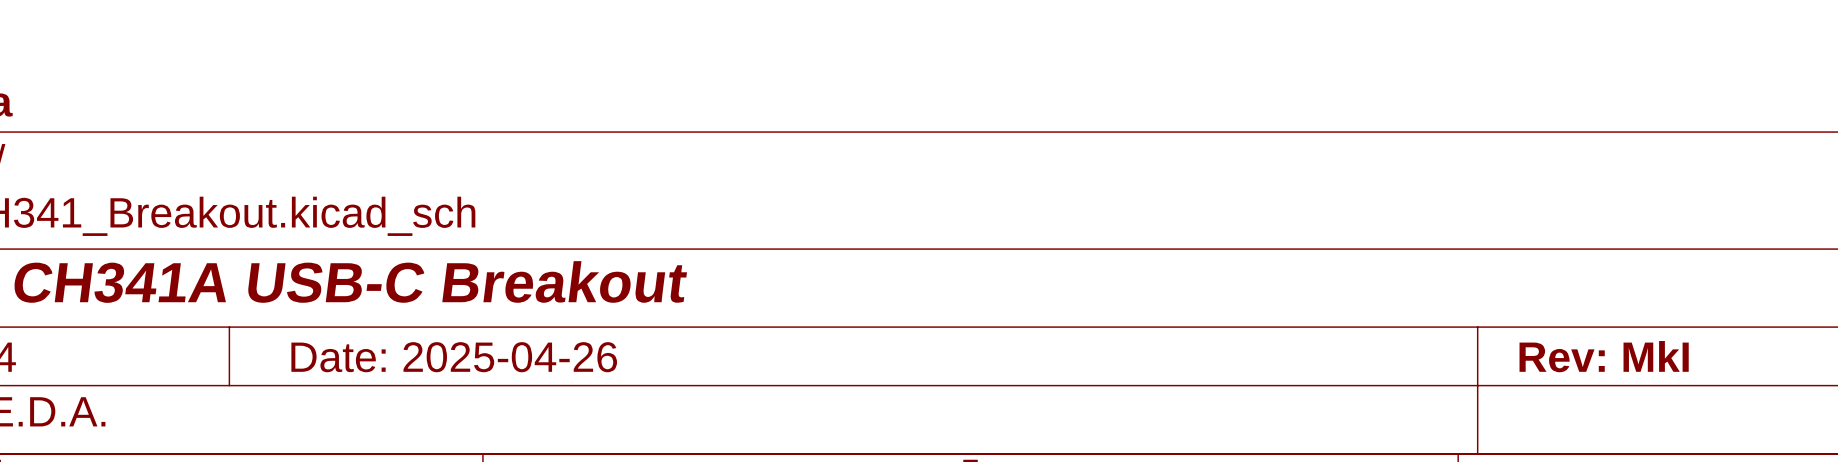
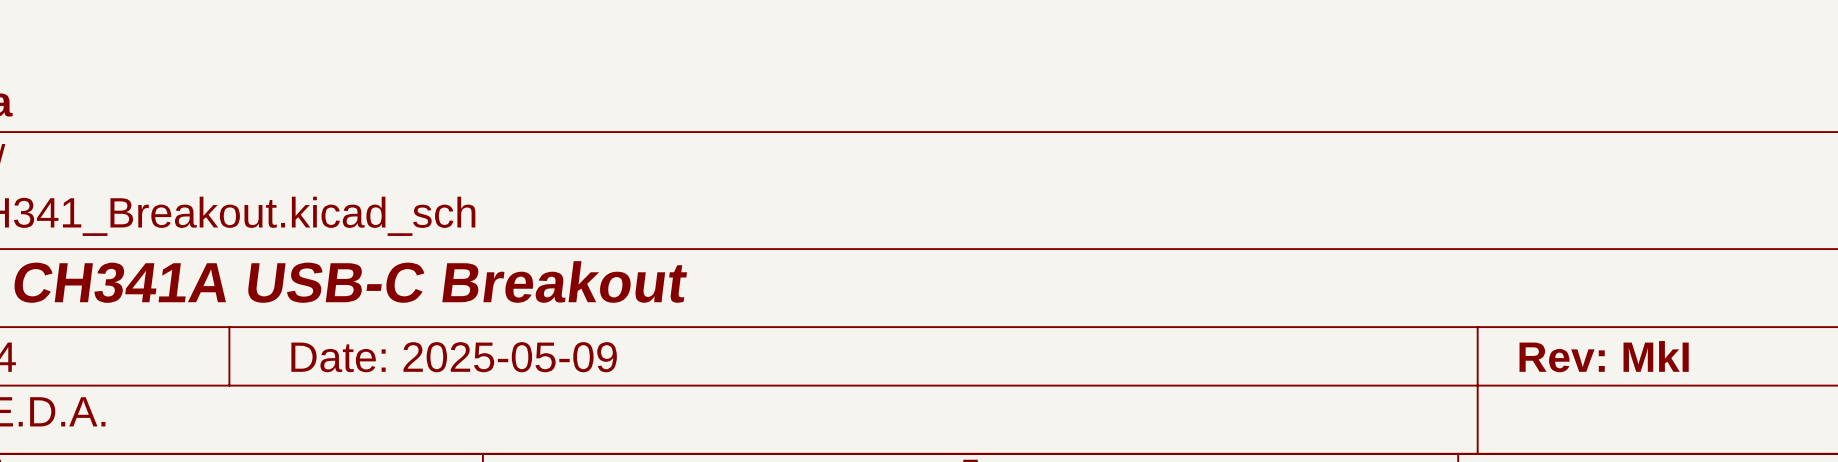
title block: Date: 2025-04-26 (454, 357) -> Date: 2025-05-09 (454, 357)

